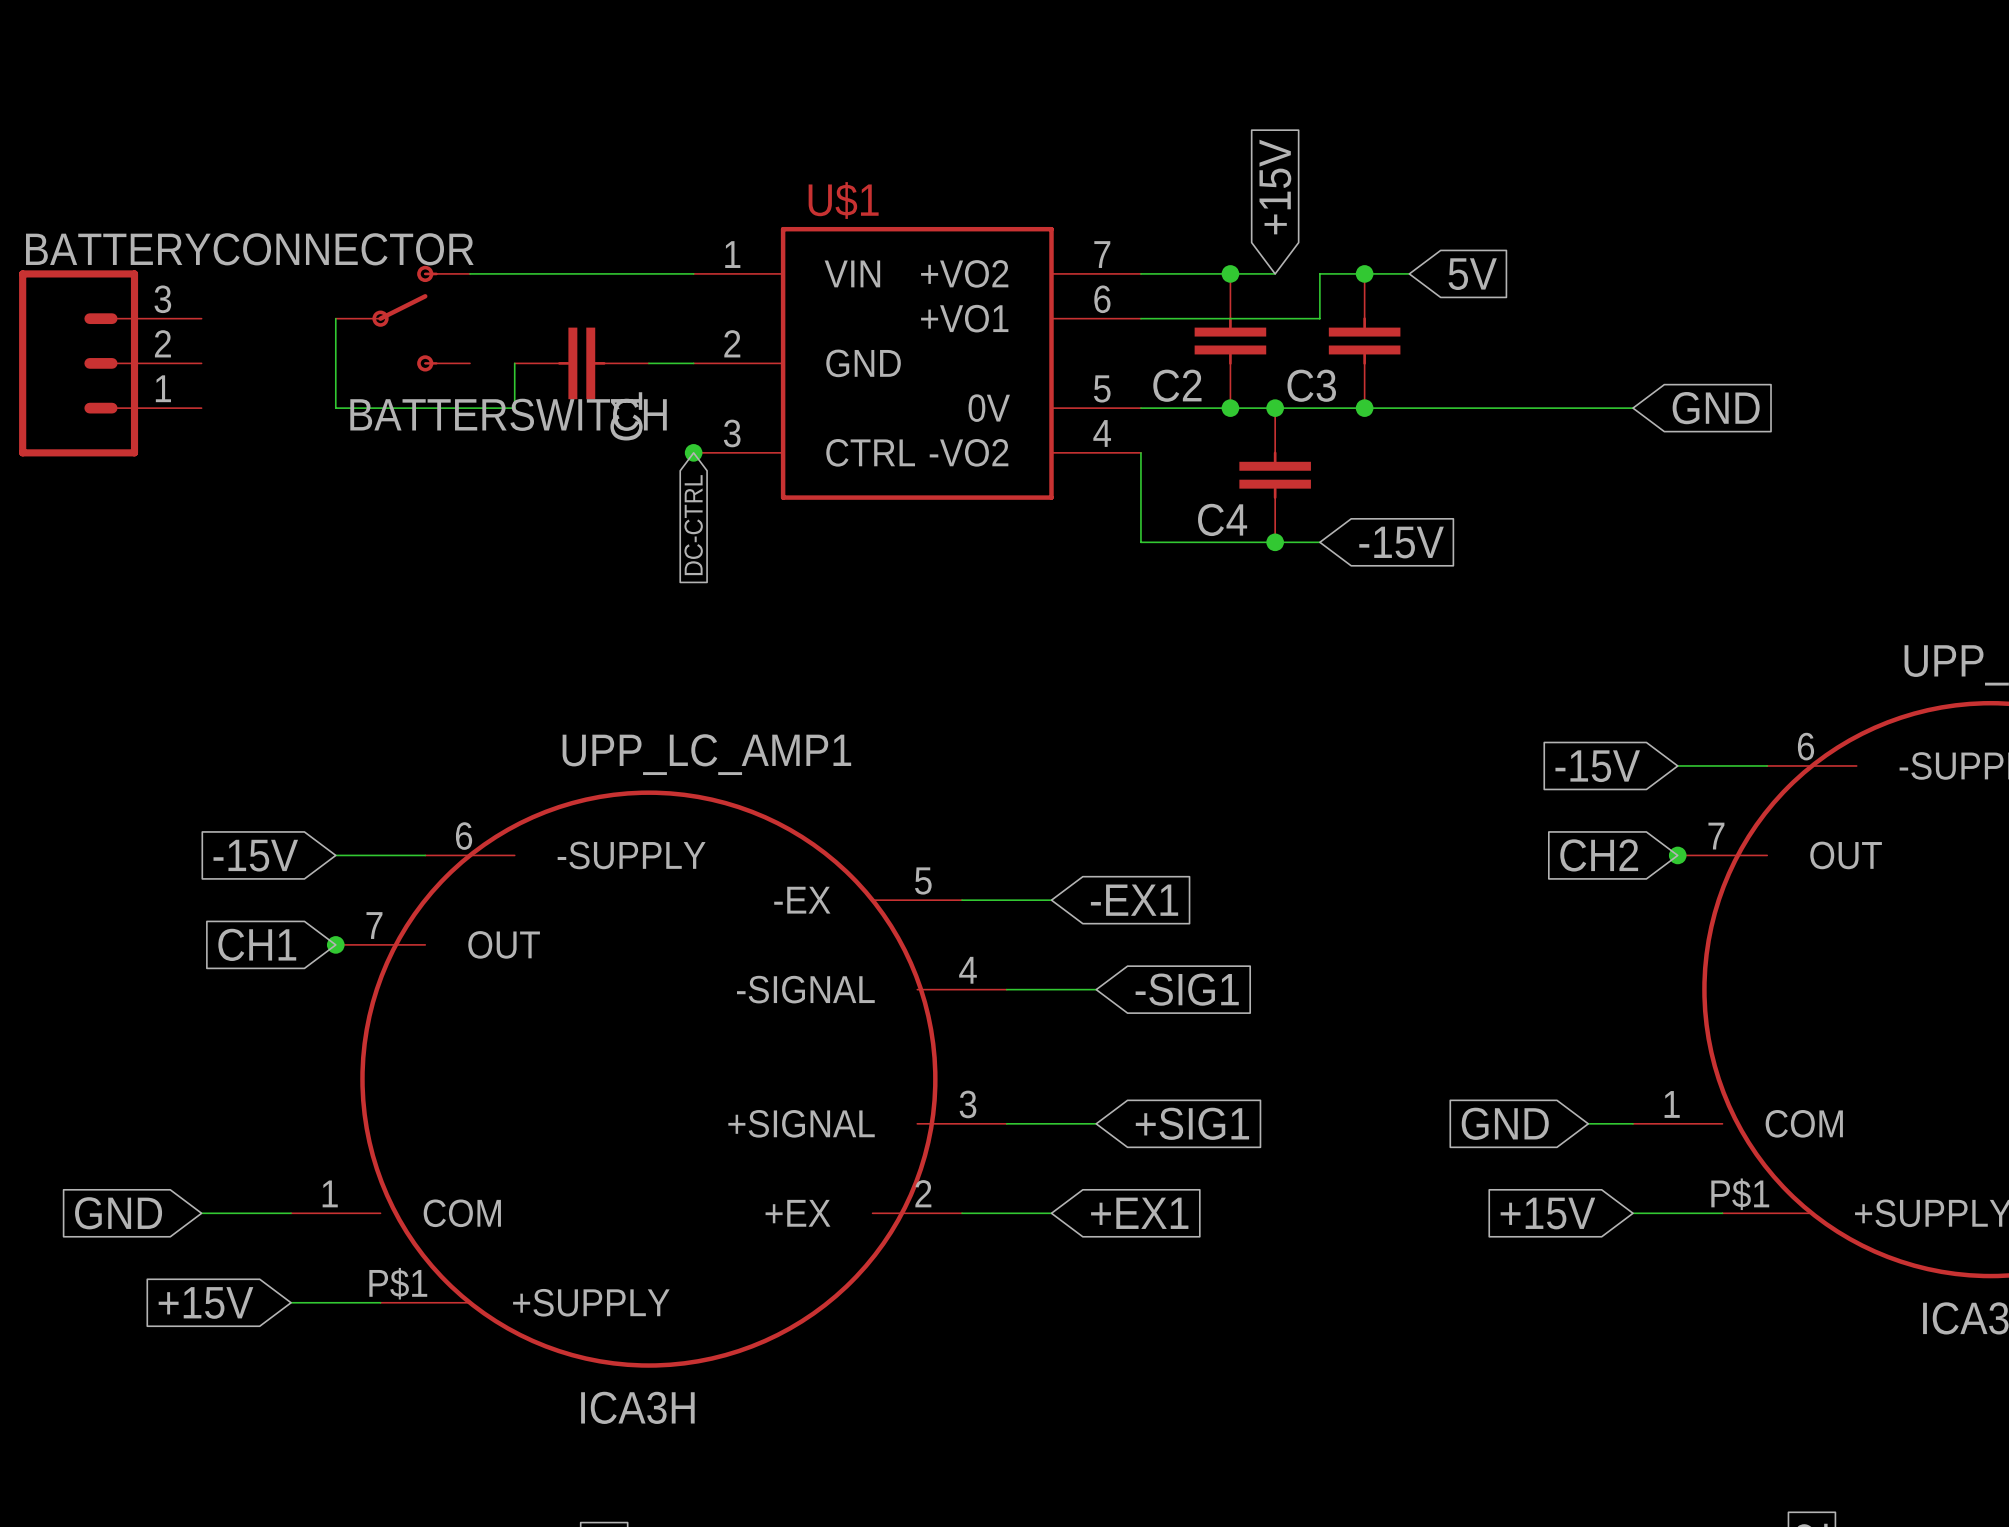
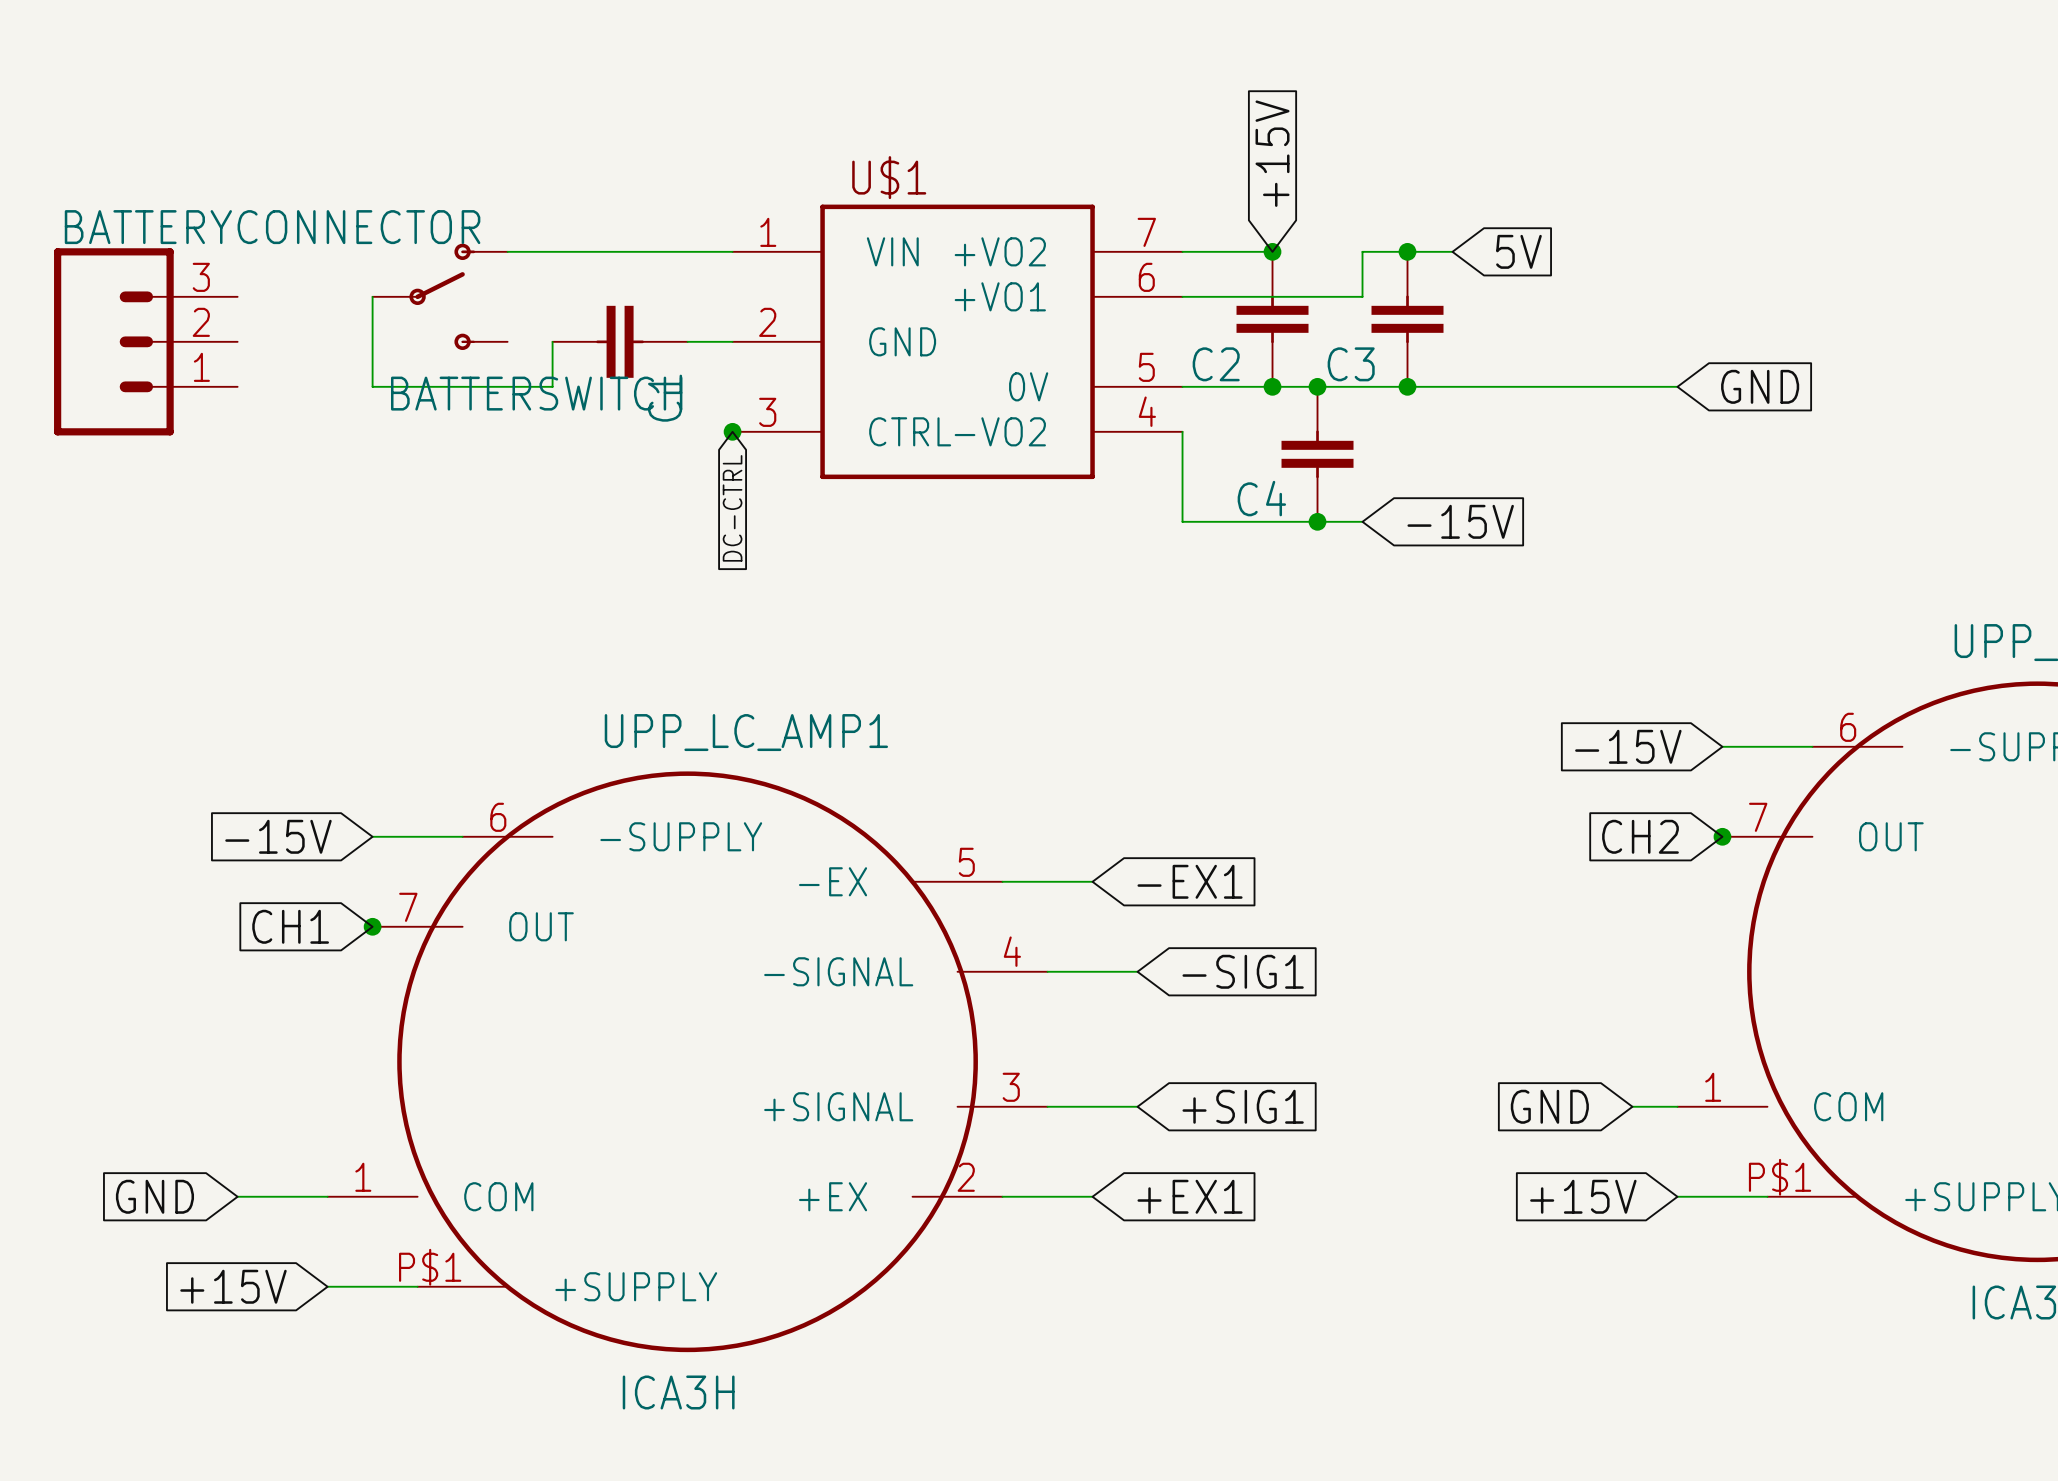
global label position: +15V (1275, 187) -> +15V (1272, 153)
wire: (1230, 273) (1275, 273) -> none

